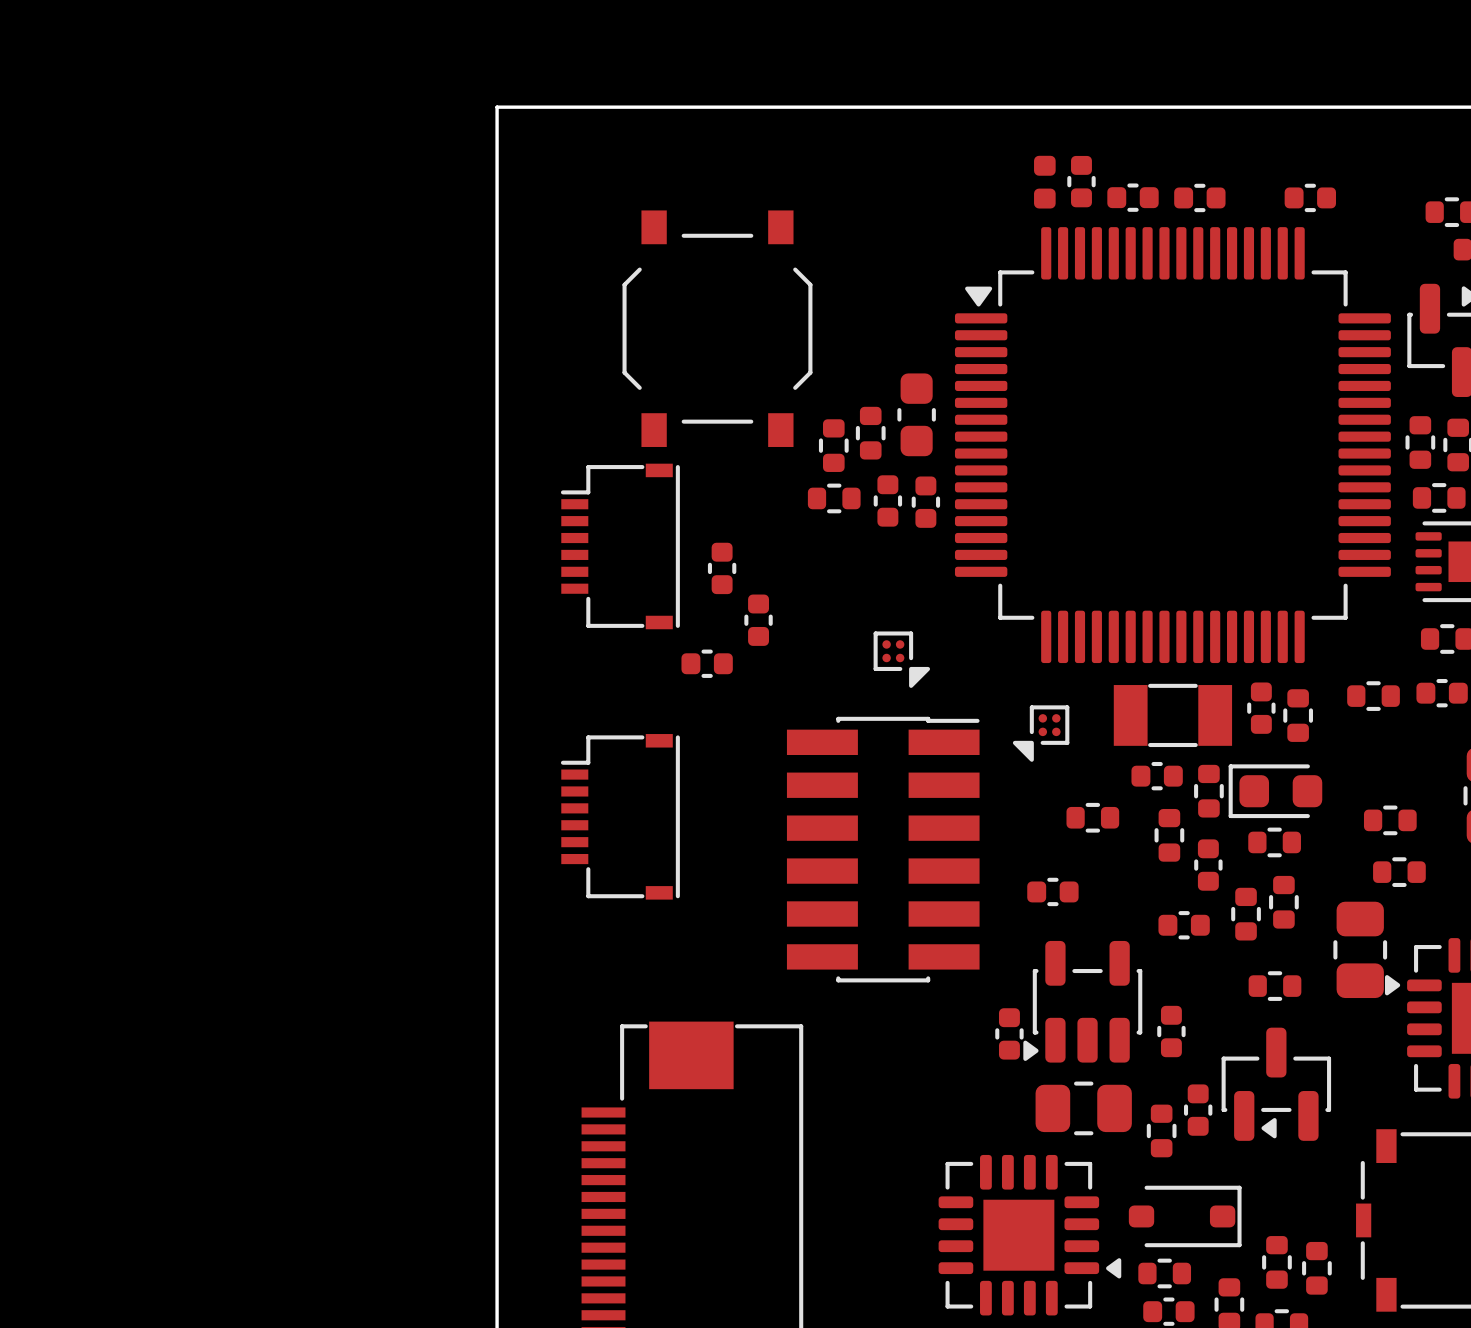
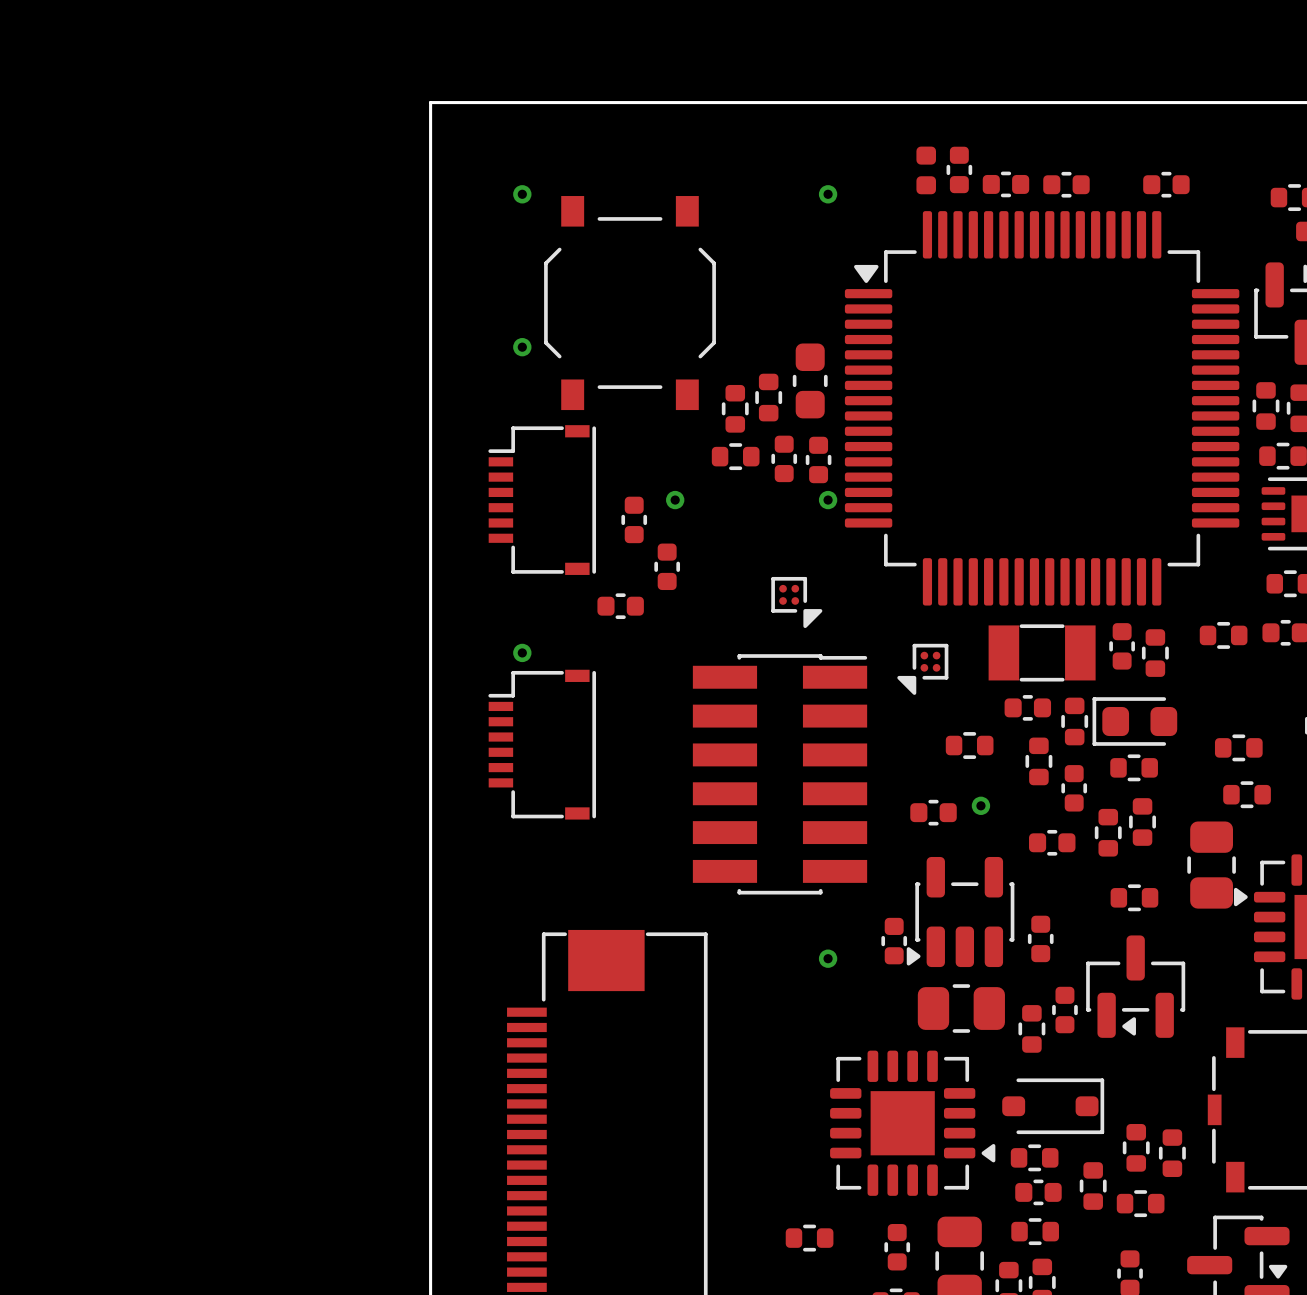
via: none -> (522, 194)
via: none -> (828, 194)
via: none -> (522, 347)
via: none -> (675, 500)
via: none -> (828, 500)
via: none -> (522, 652)
via: none -> (980, 805)
via: none -> (828, 958)

